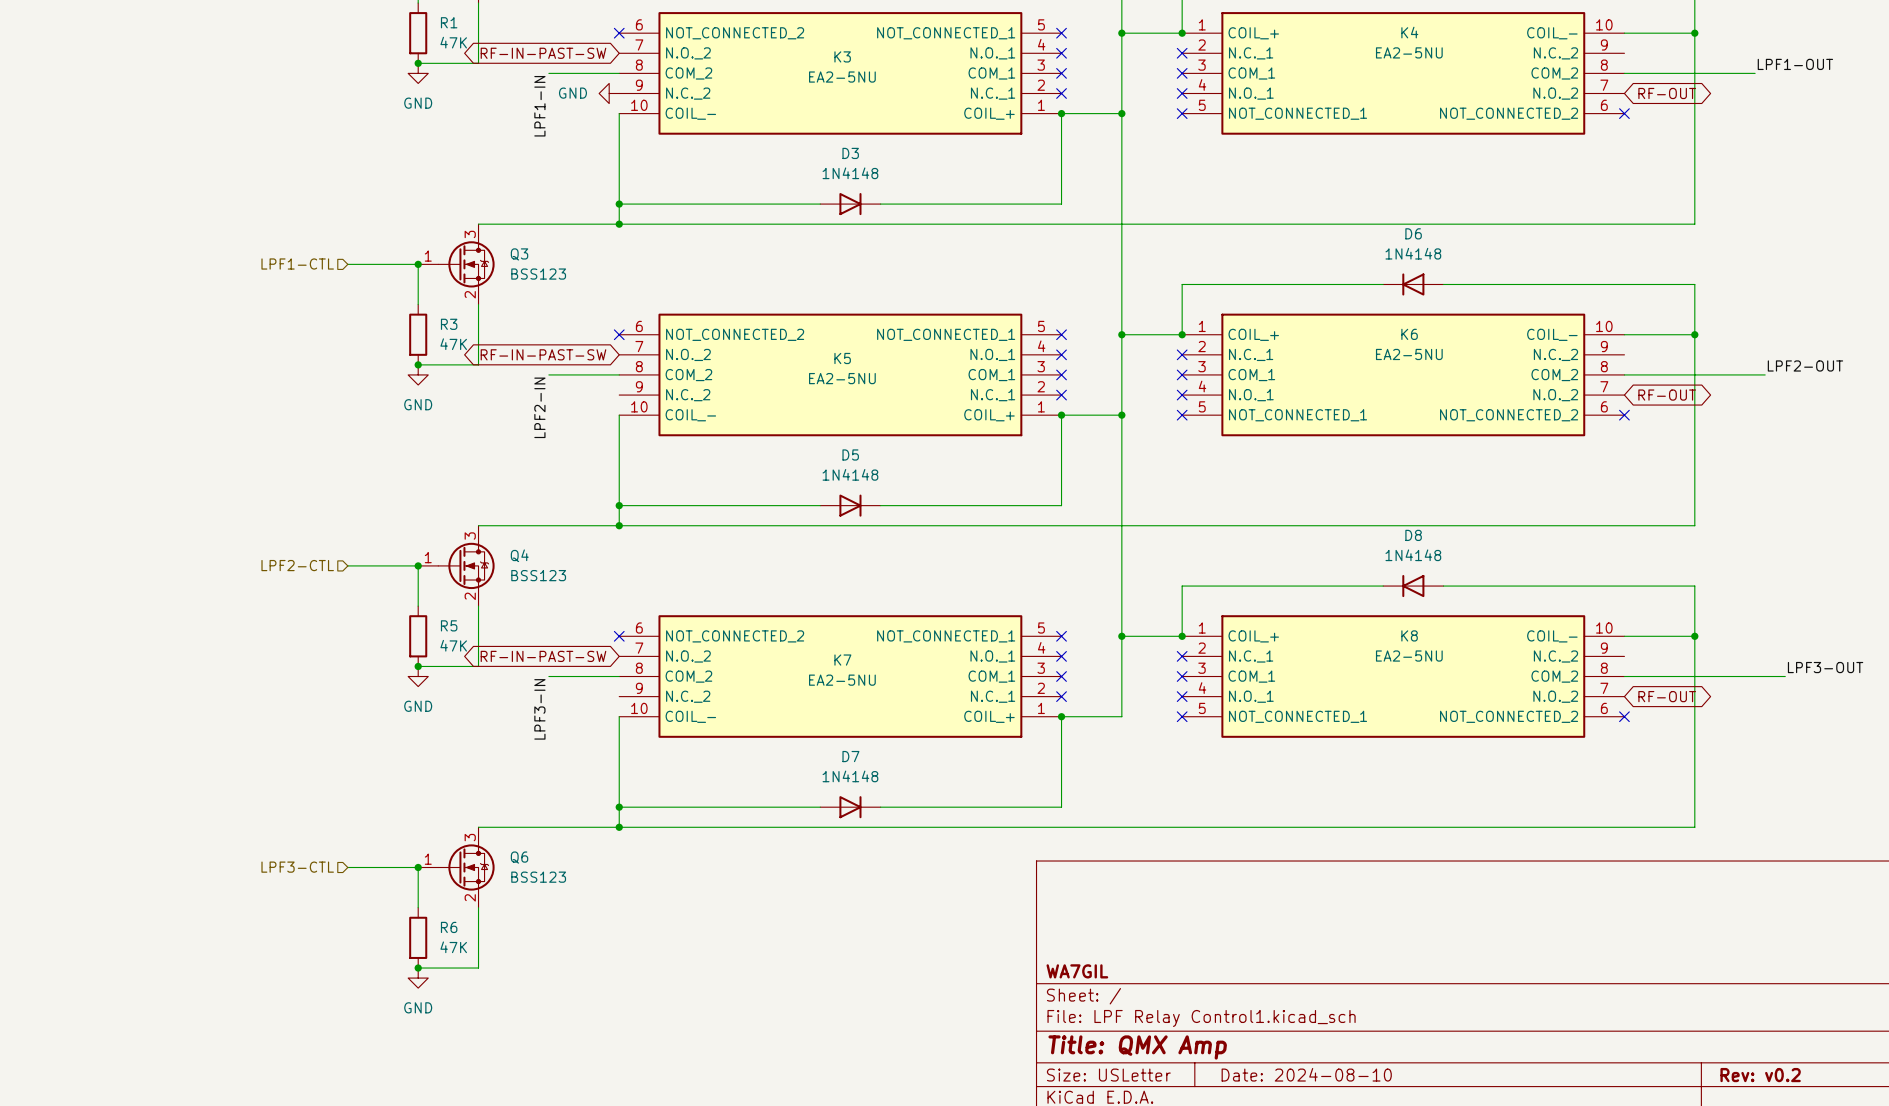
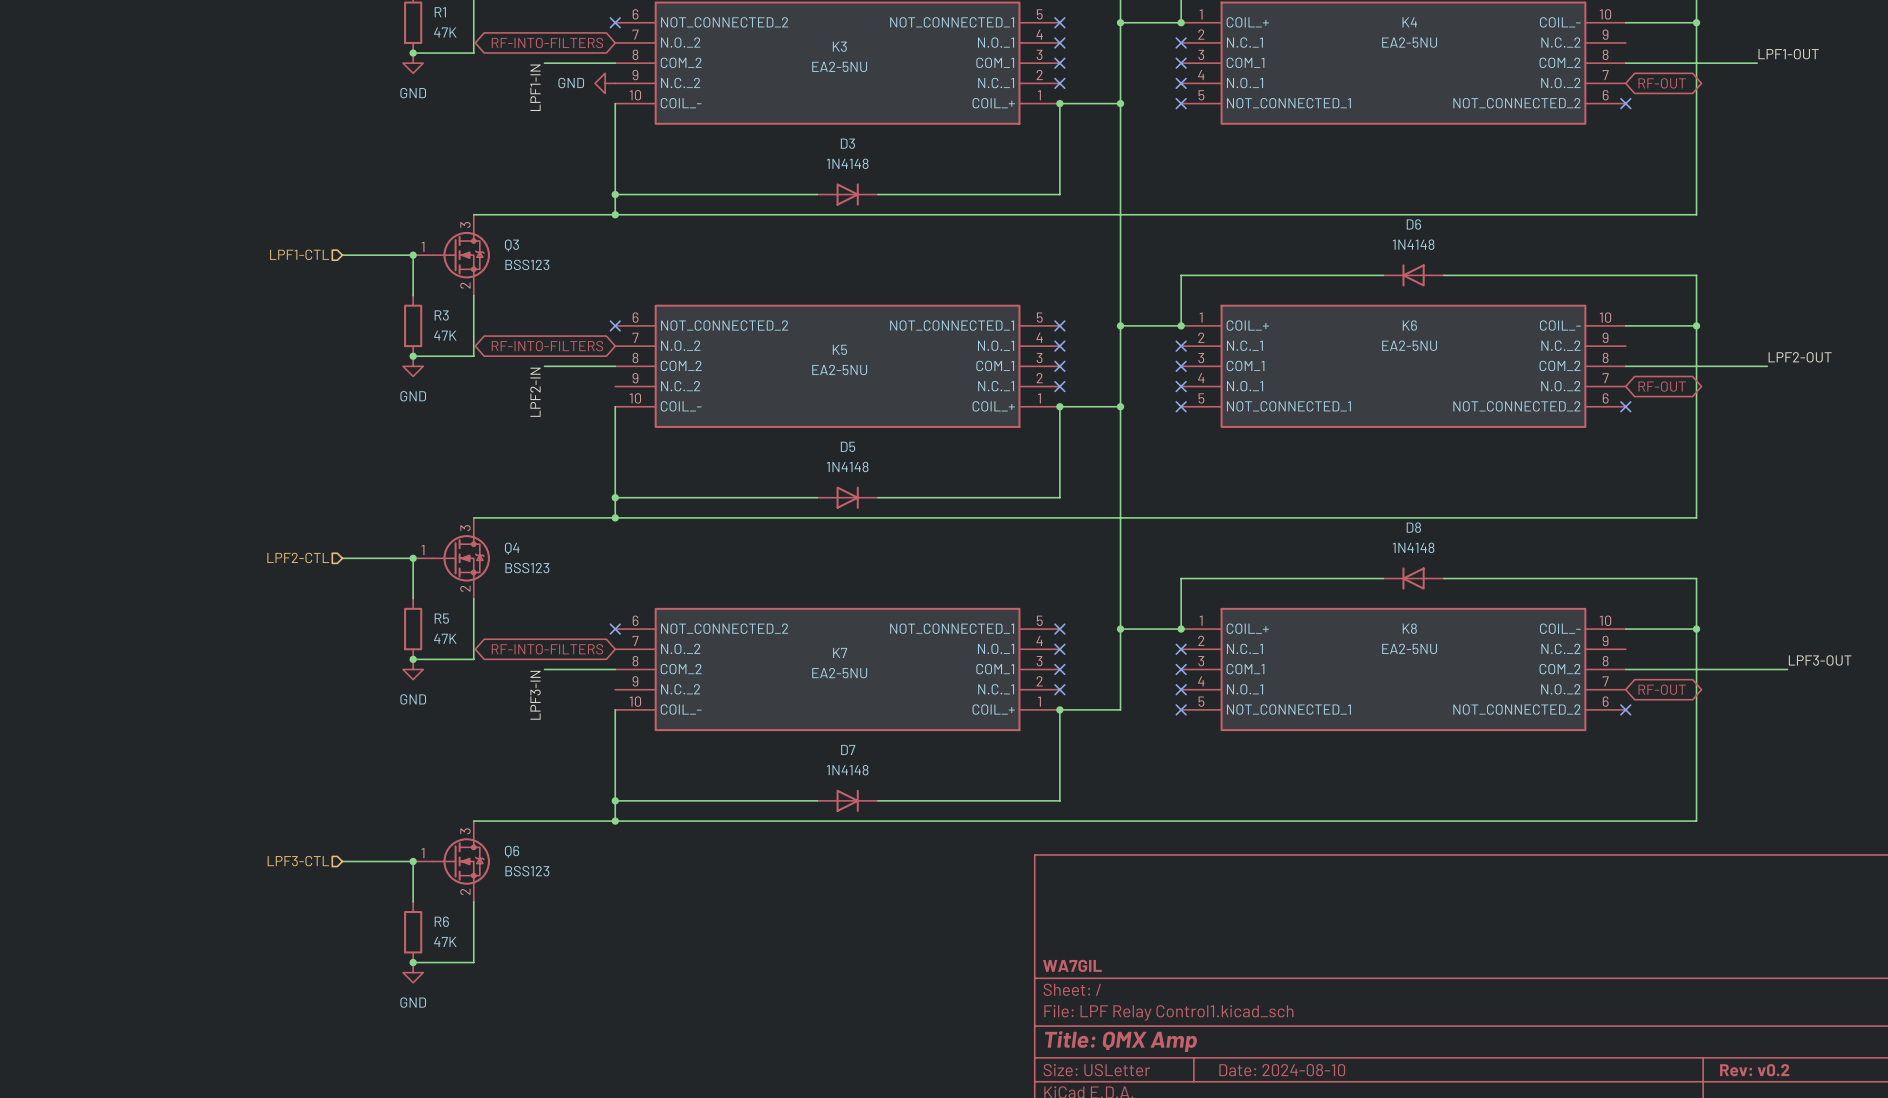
global label: RF-IN-PAST-SW (543, 53) -> RF-INTO-FILTERS (547, 42)
global label: RF-IN-PAST-SW (543, 354) -> RF-INTO-FILTERS (547, 346)
global label: RF-IN-PAST-SW (543, 656) -> RF-INTO-FILTERS (547, 649)

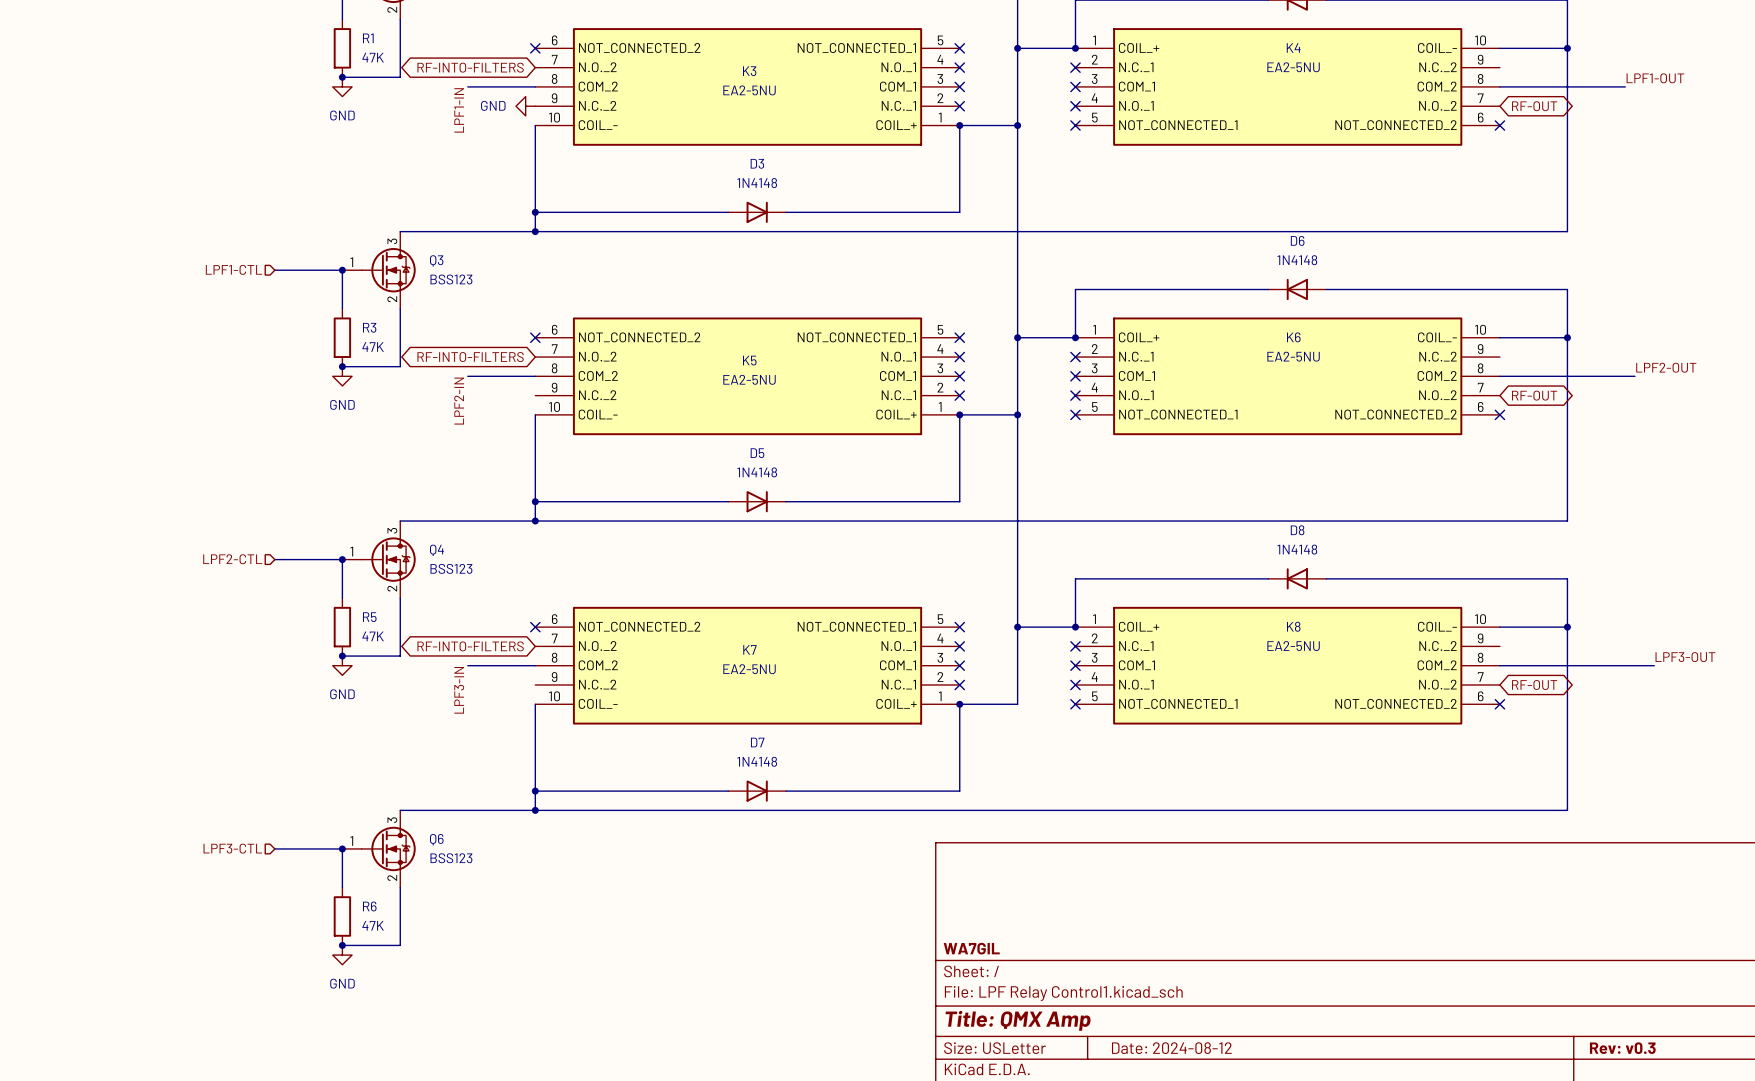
title block: Date: 2024-08-10 (1282, 1070) -> Date: 2024-08-12 (1171, 1048)
title block: Rev: v0.2 (1754, 1070) -> Rev: v0.3 (1622, 1048)

